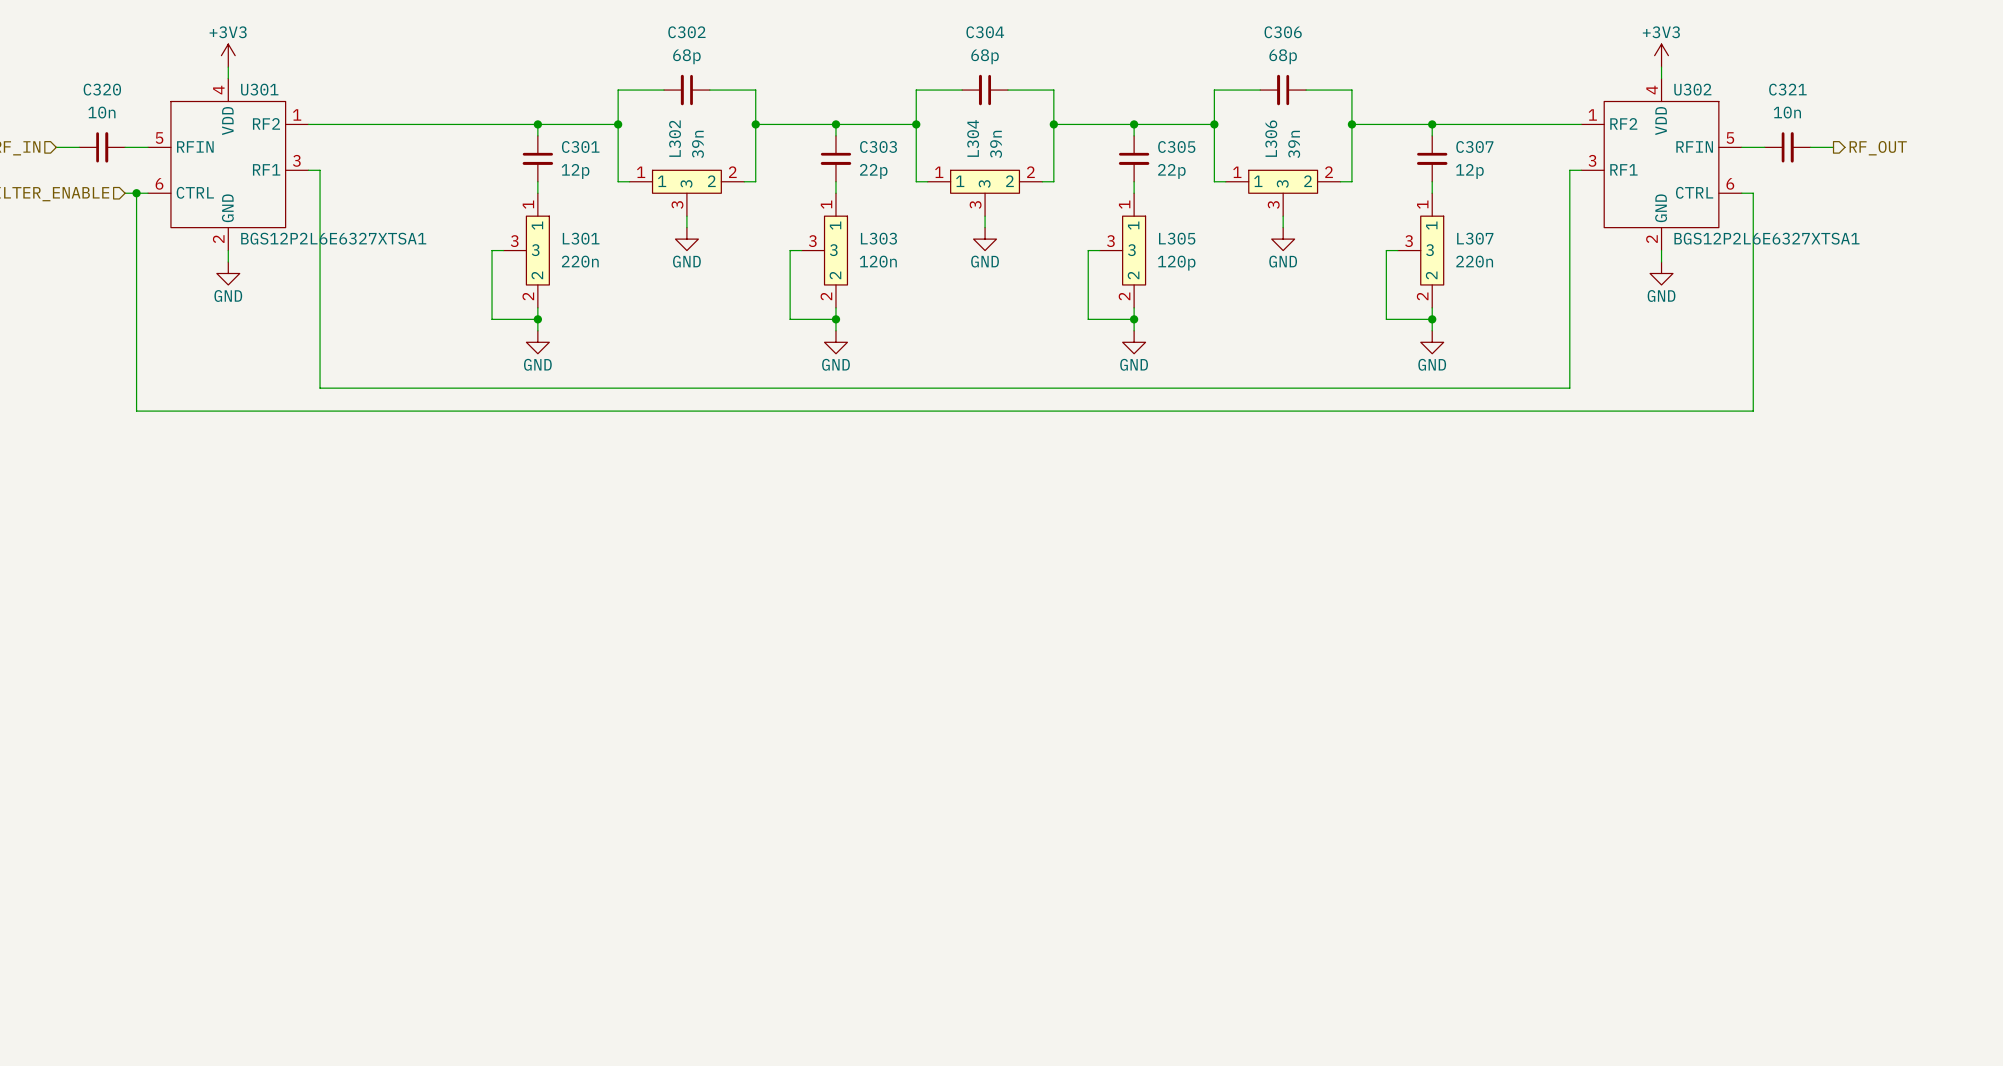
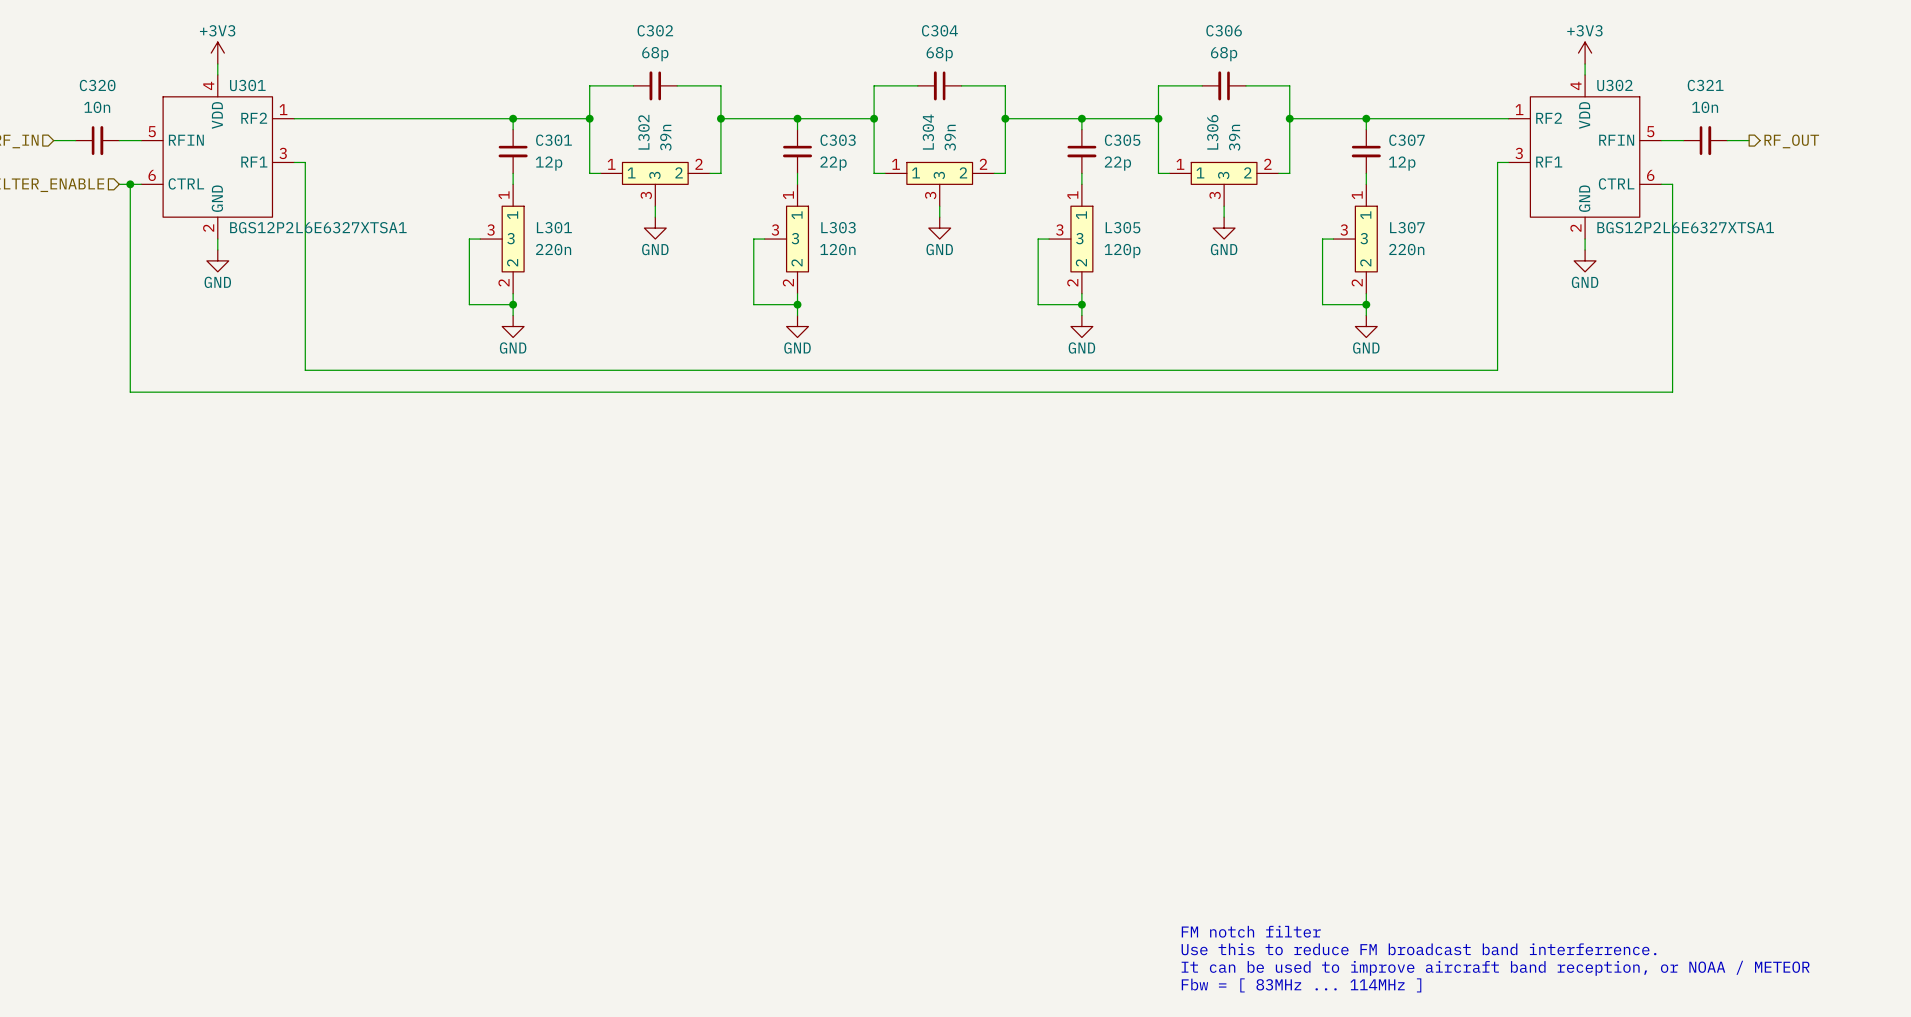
text: none -> FM notch filter (1251, 931)
text: none -> Use this to reduce FM broadcast band interferrence. (1418, 949)
text: none -> It can be used to improve aircraft band reception, or NOAA / METEOR (1495, 968)
text: none -> Fbw = [ 83MHz ... 114MHz ] (1301, 985)

